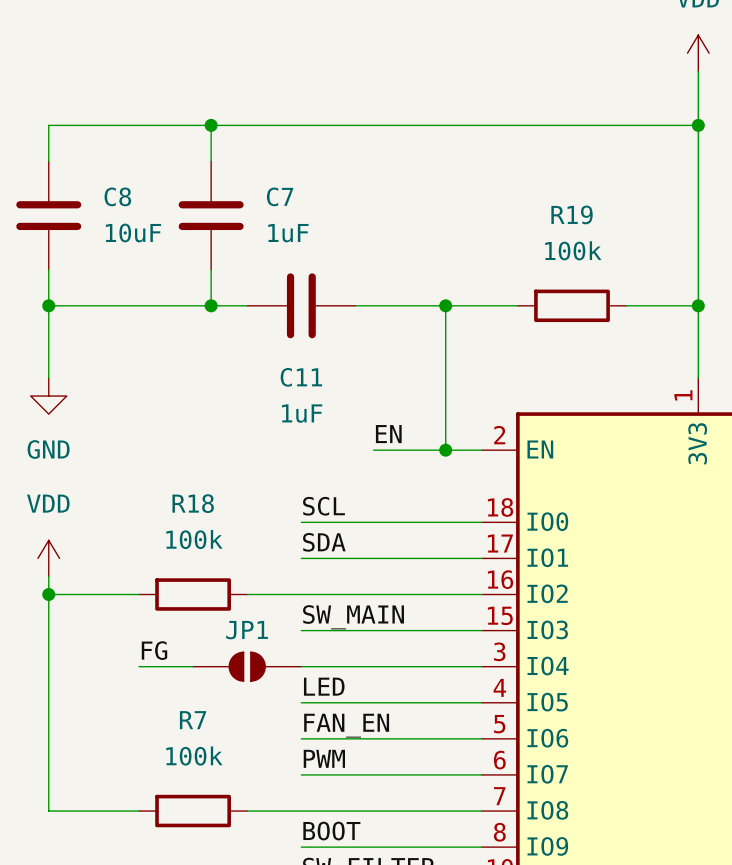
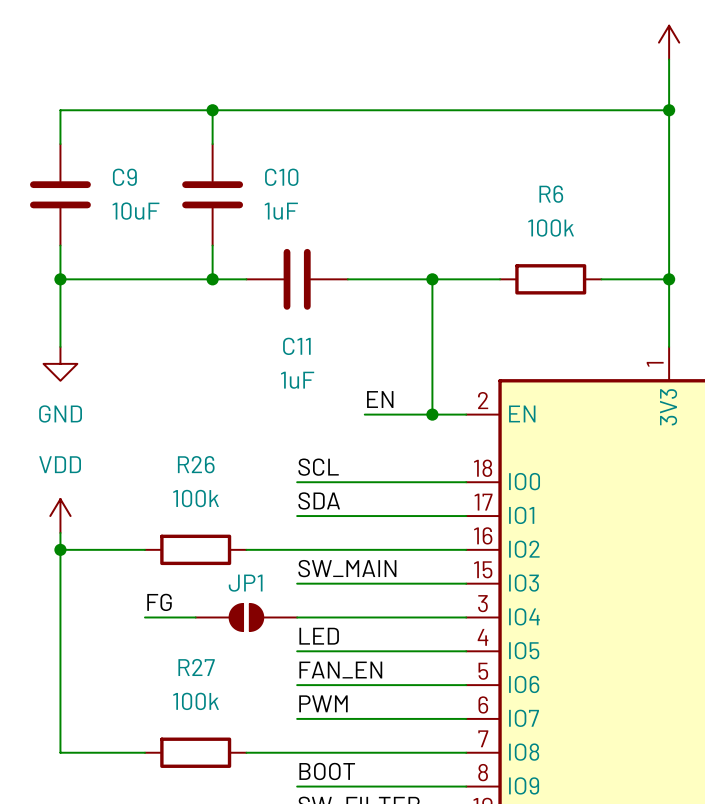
C8 name: C8 (117, 196) -> C9 (124, 177)
C7 name: C7 (280, 196) -> C10 (281, 177)
R19 name: R19 (572, 214) -> R6 (551, 194)
R18 name: R18 (193, 503) -> R26 (196, 464)
R7 name: R7 (193, 720) -> R27 (196, 667)

